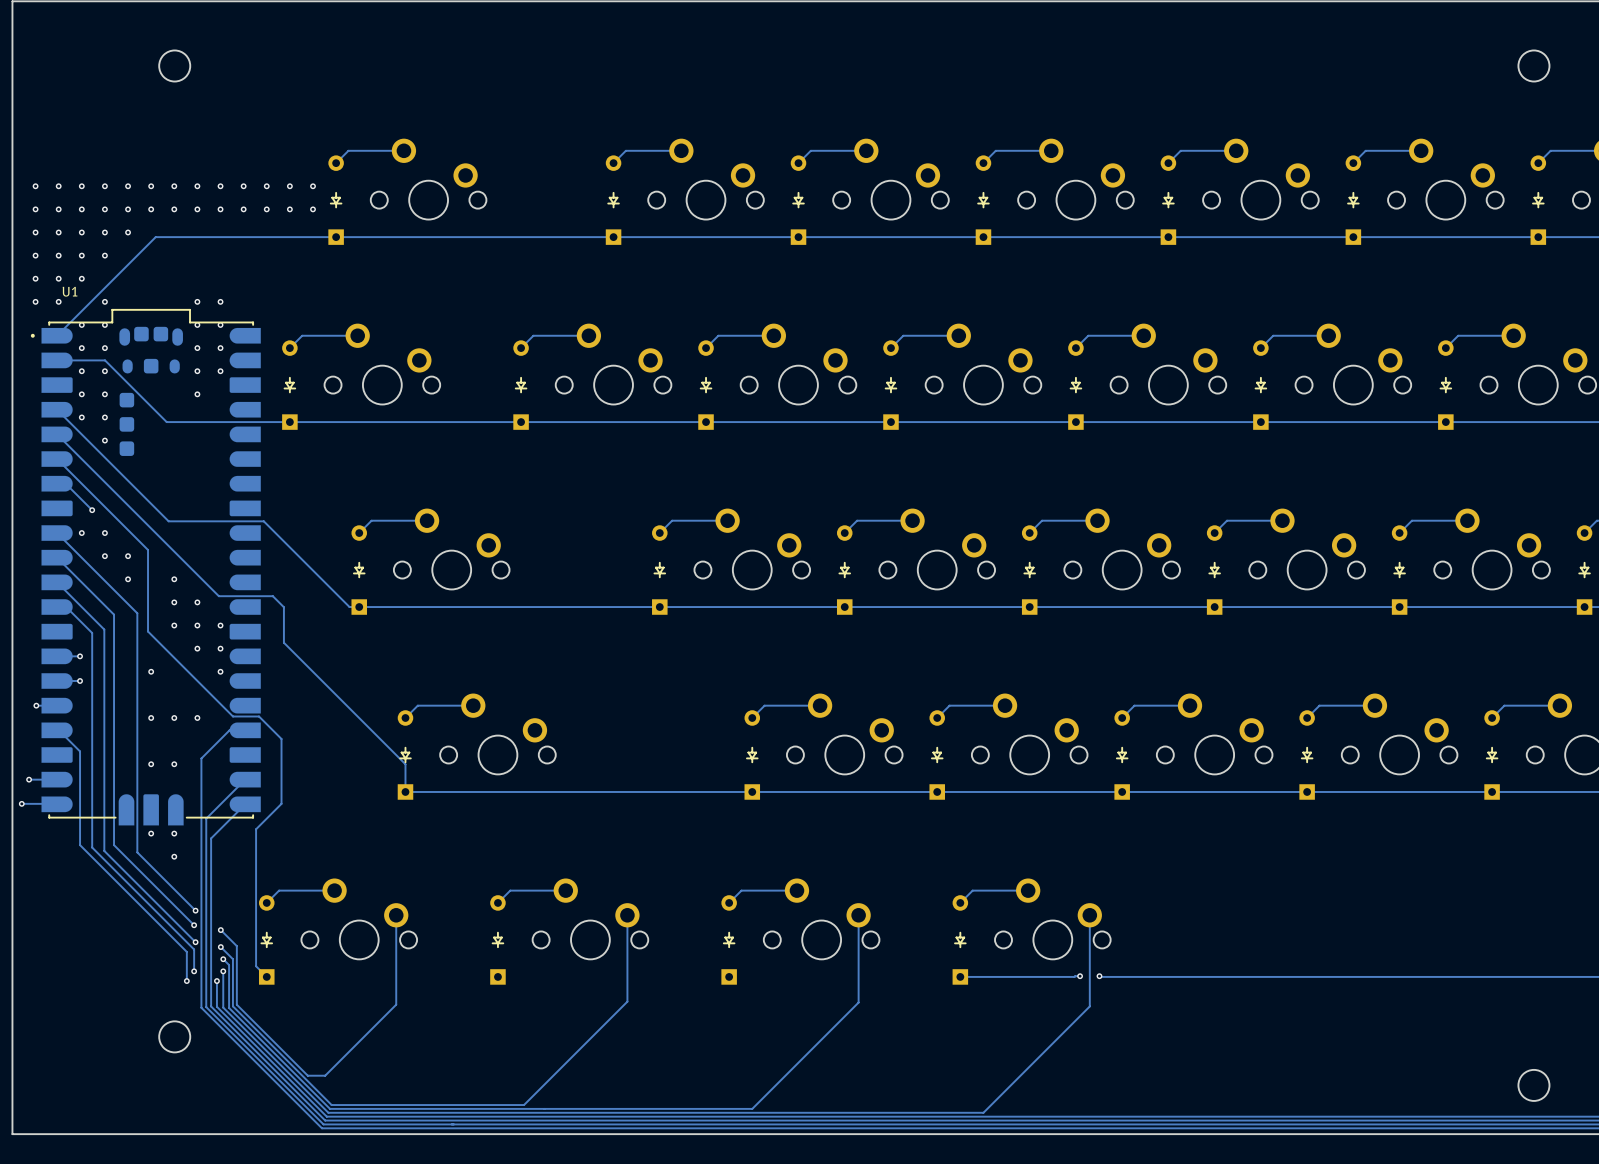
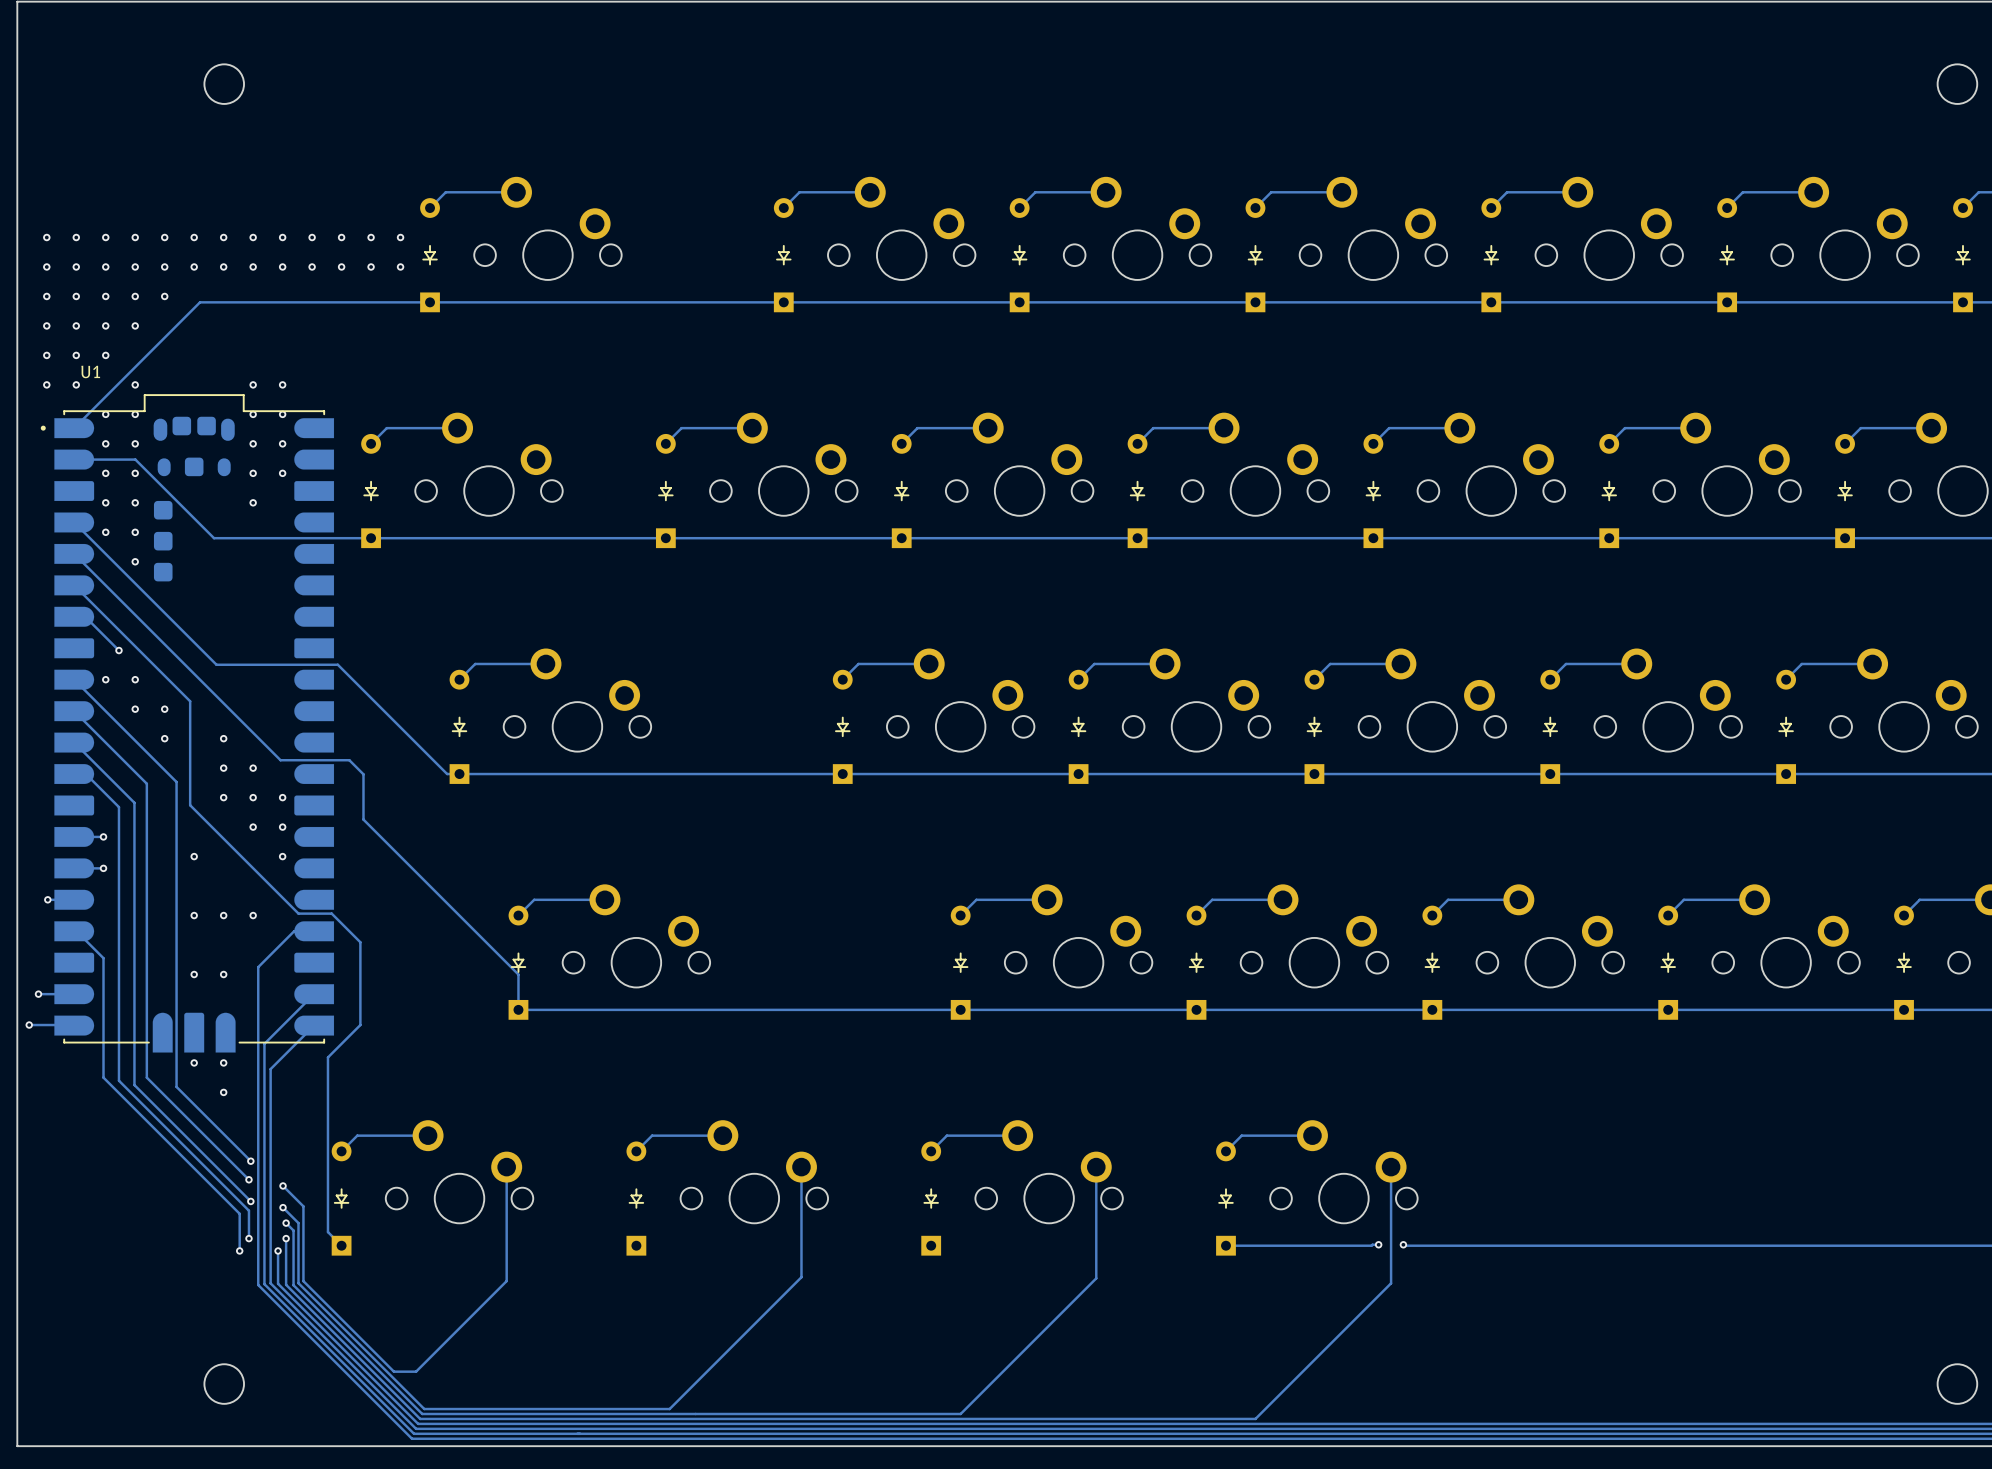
round board edge position: (174, 1036) -> (224, 1384)

